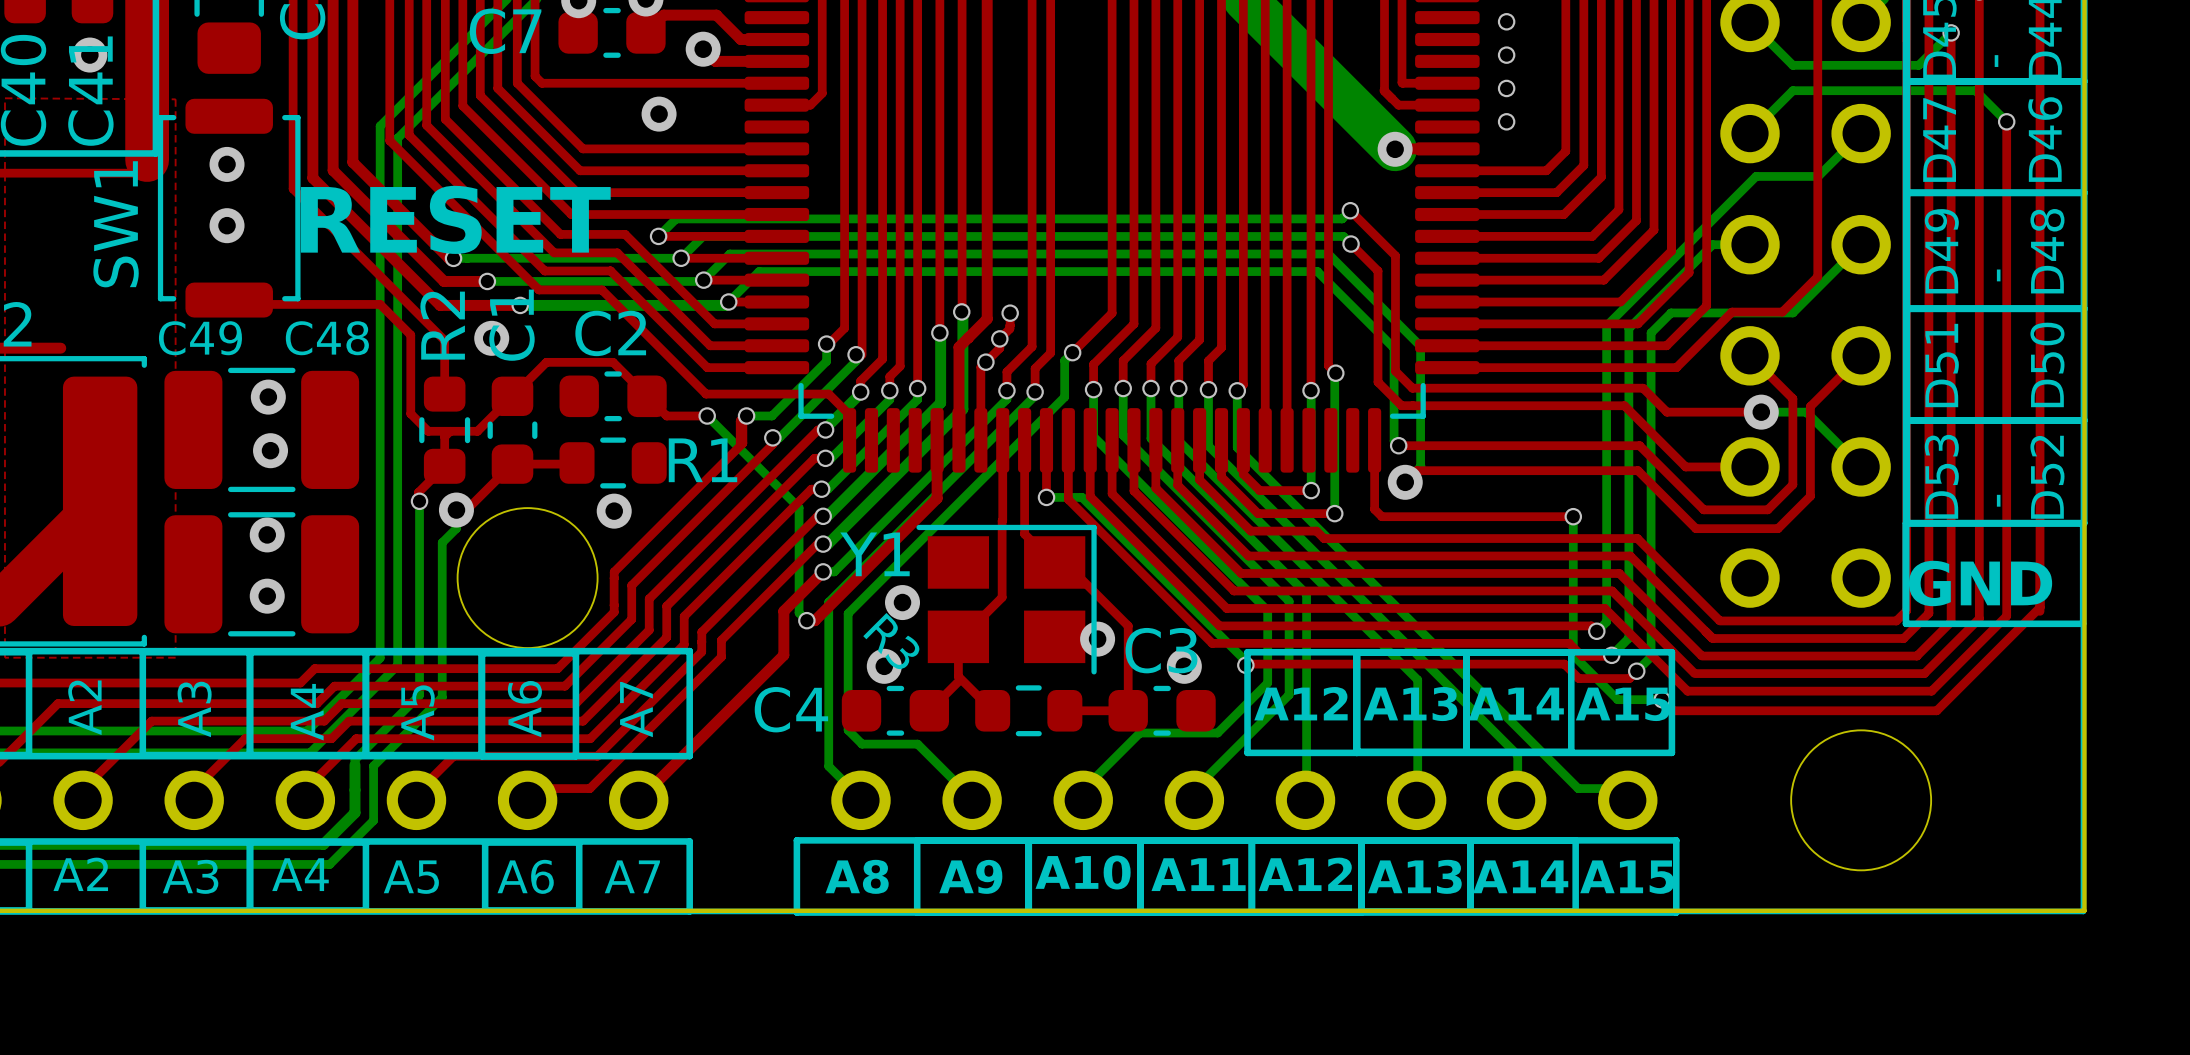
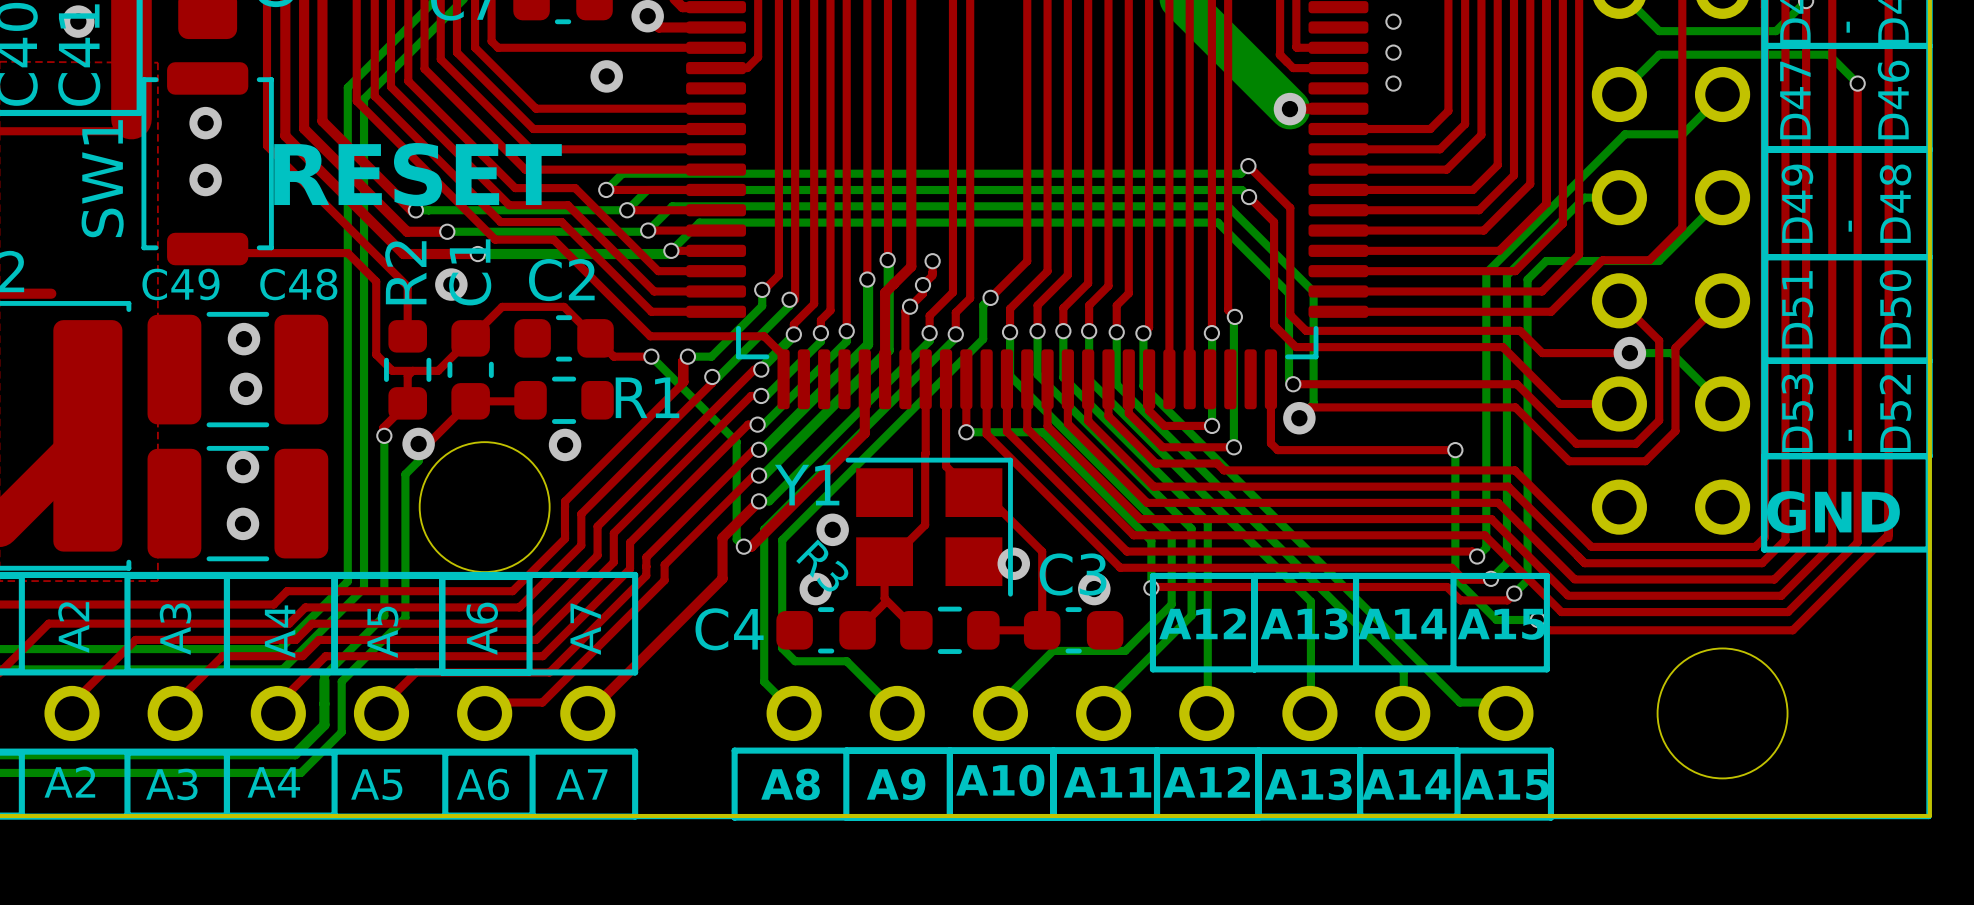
bottom track: (1082, 497) (1245, 661) -> (999, 432) (1042, 432) (1151, 540) (1151, 584)

